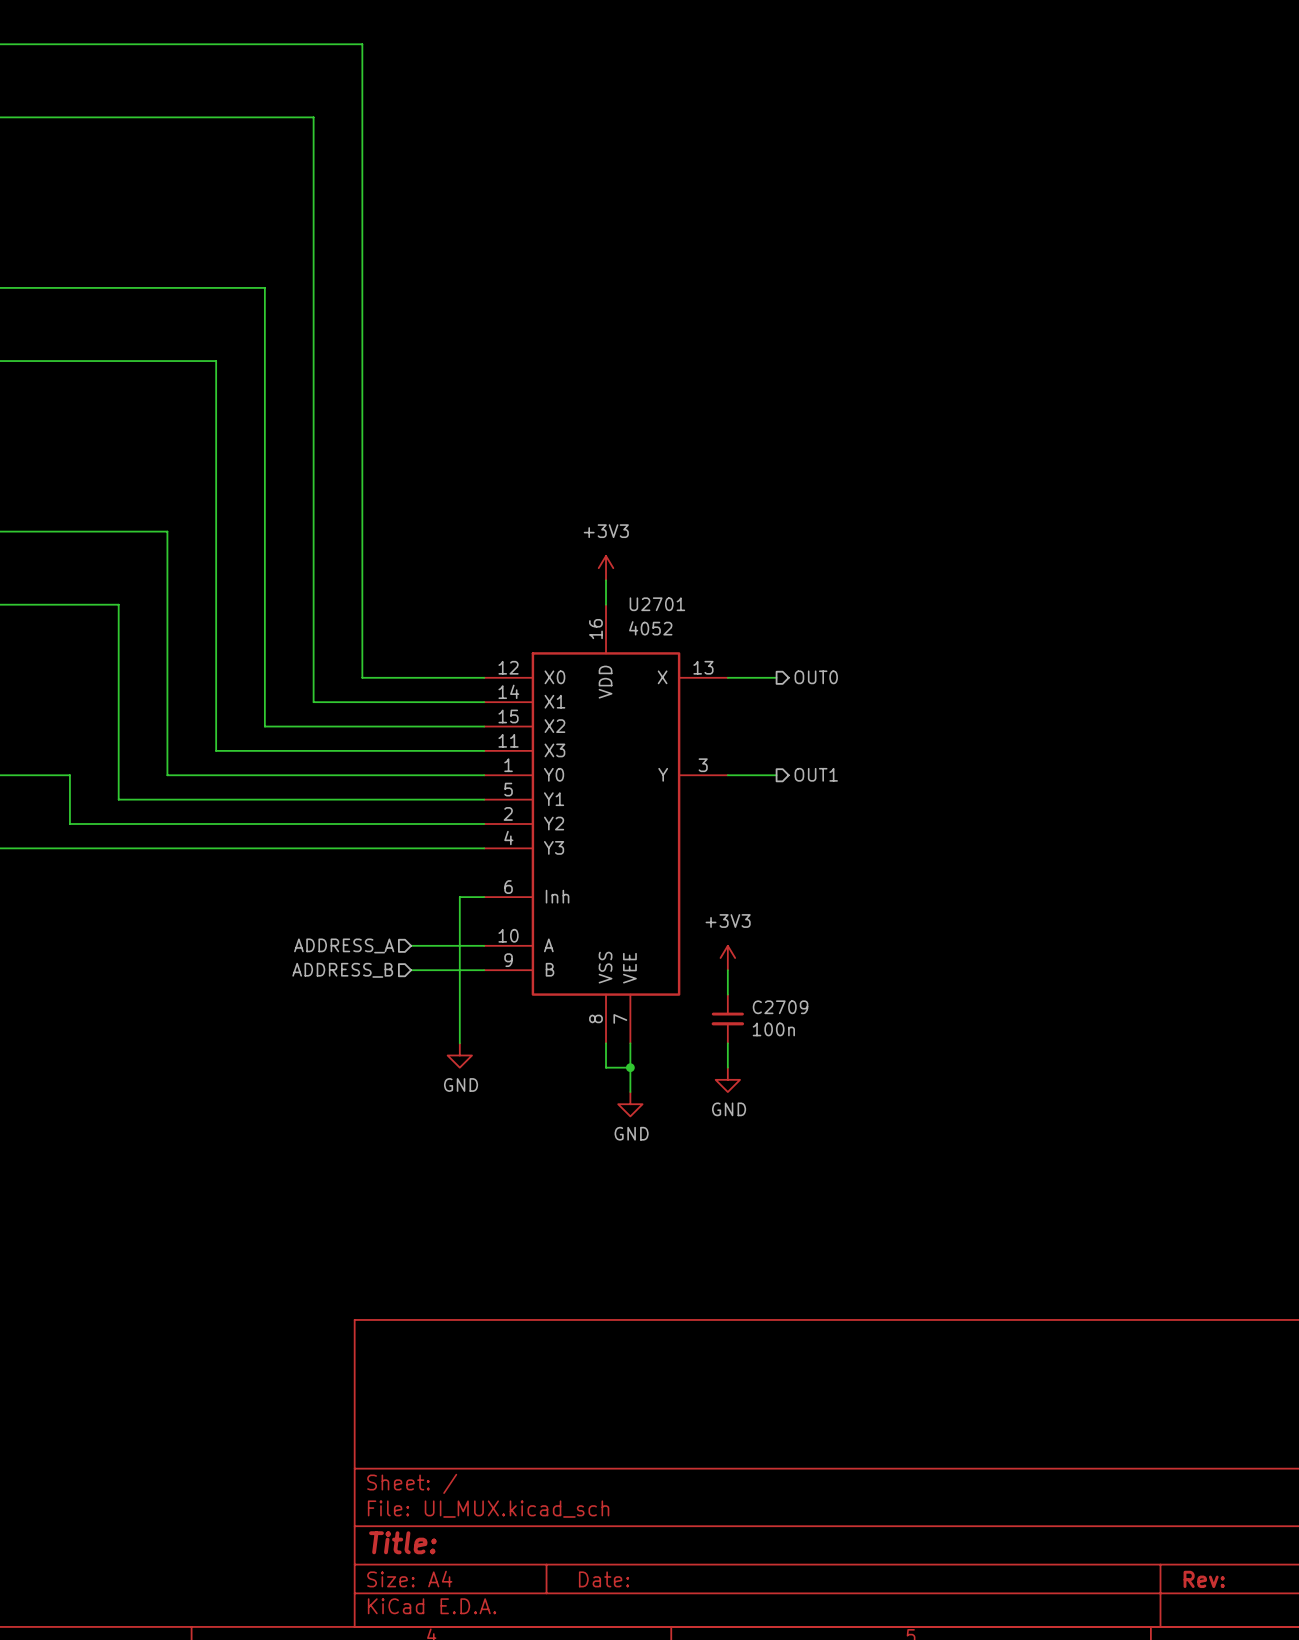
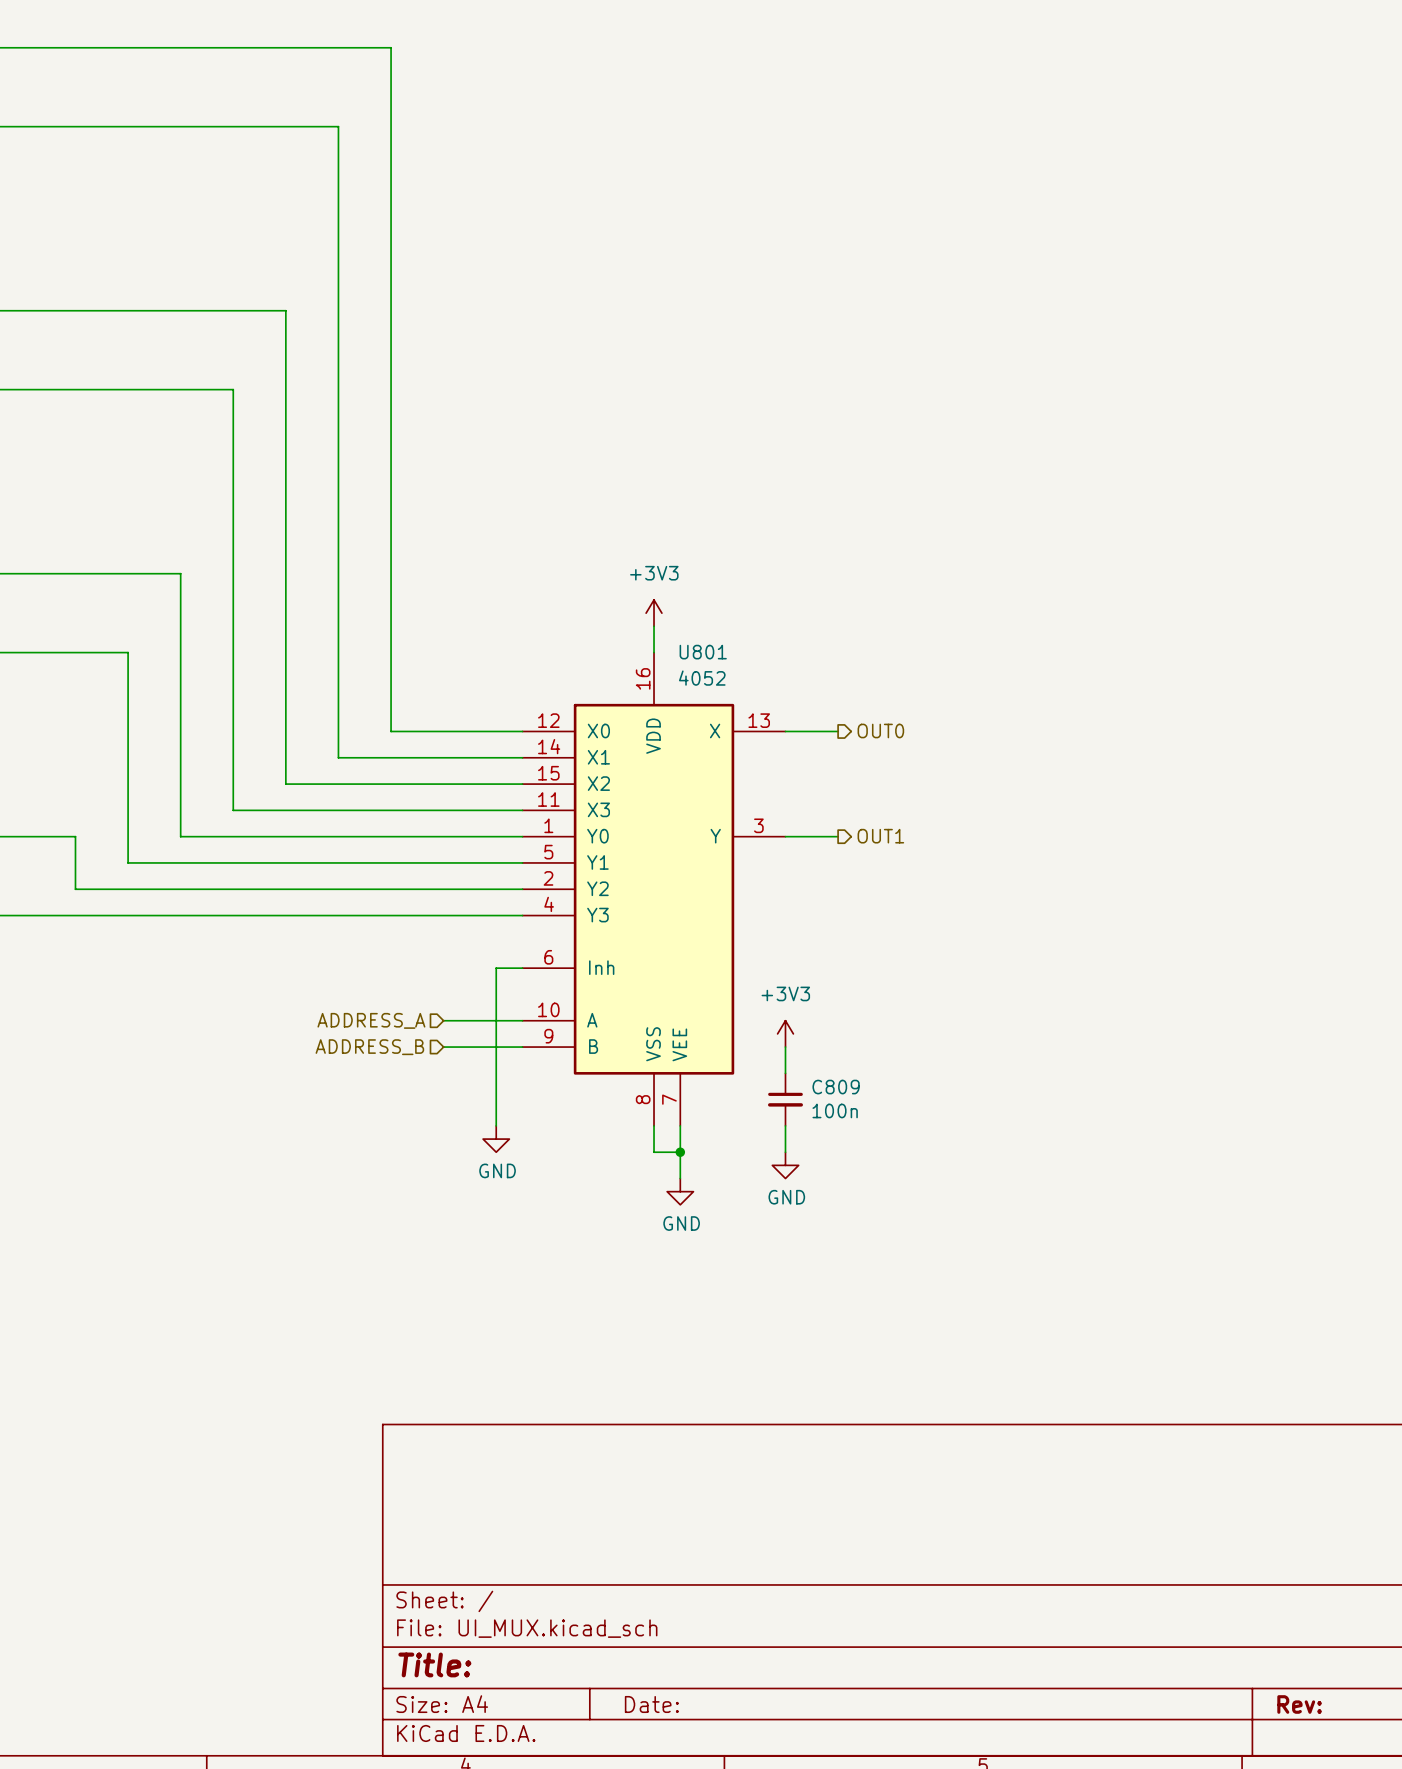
U2701 name: U2701 (657, 604) -> U801 (703, 652)
C2709 name: C2709 (780, 1007) -> C809 (836, 1087)

